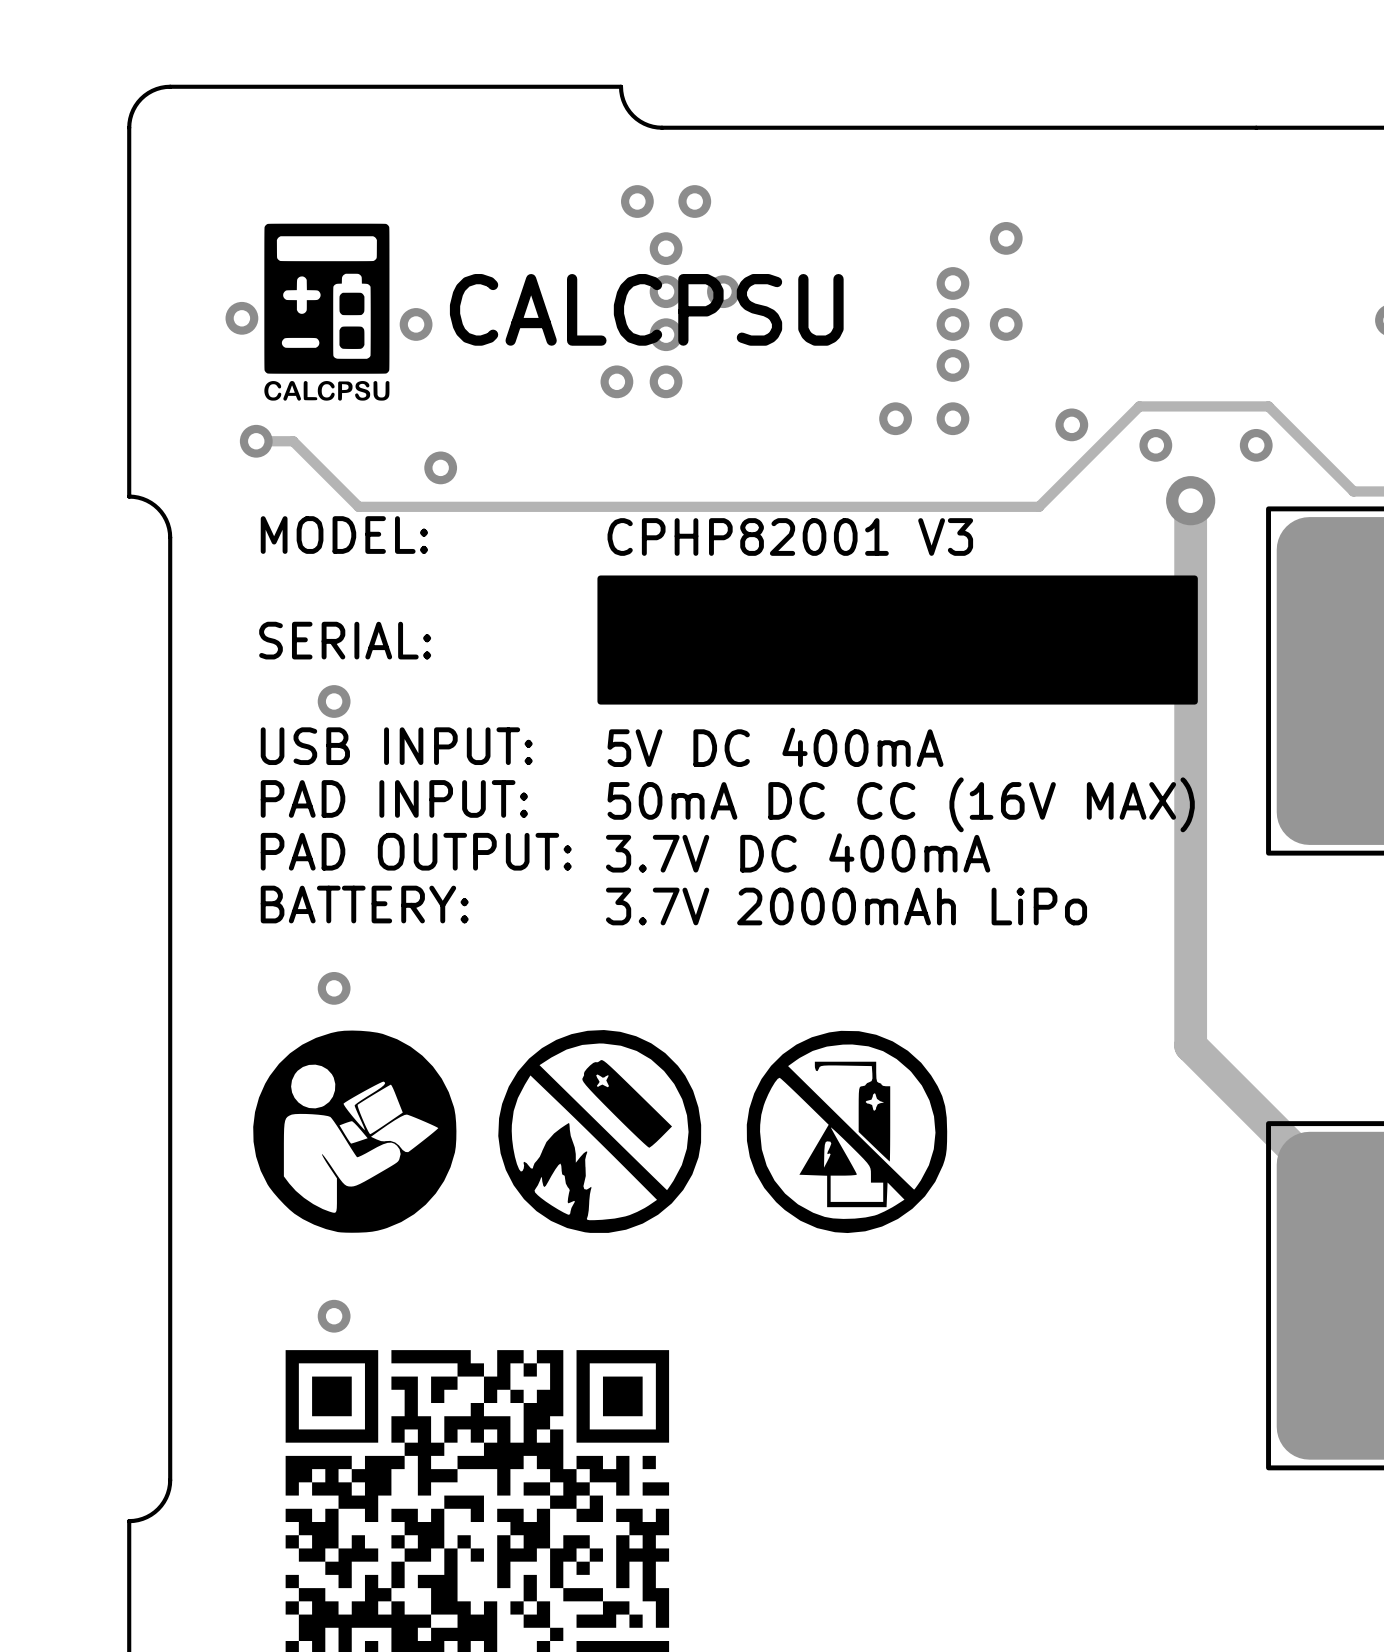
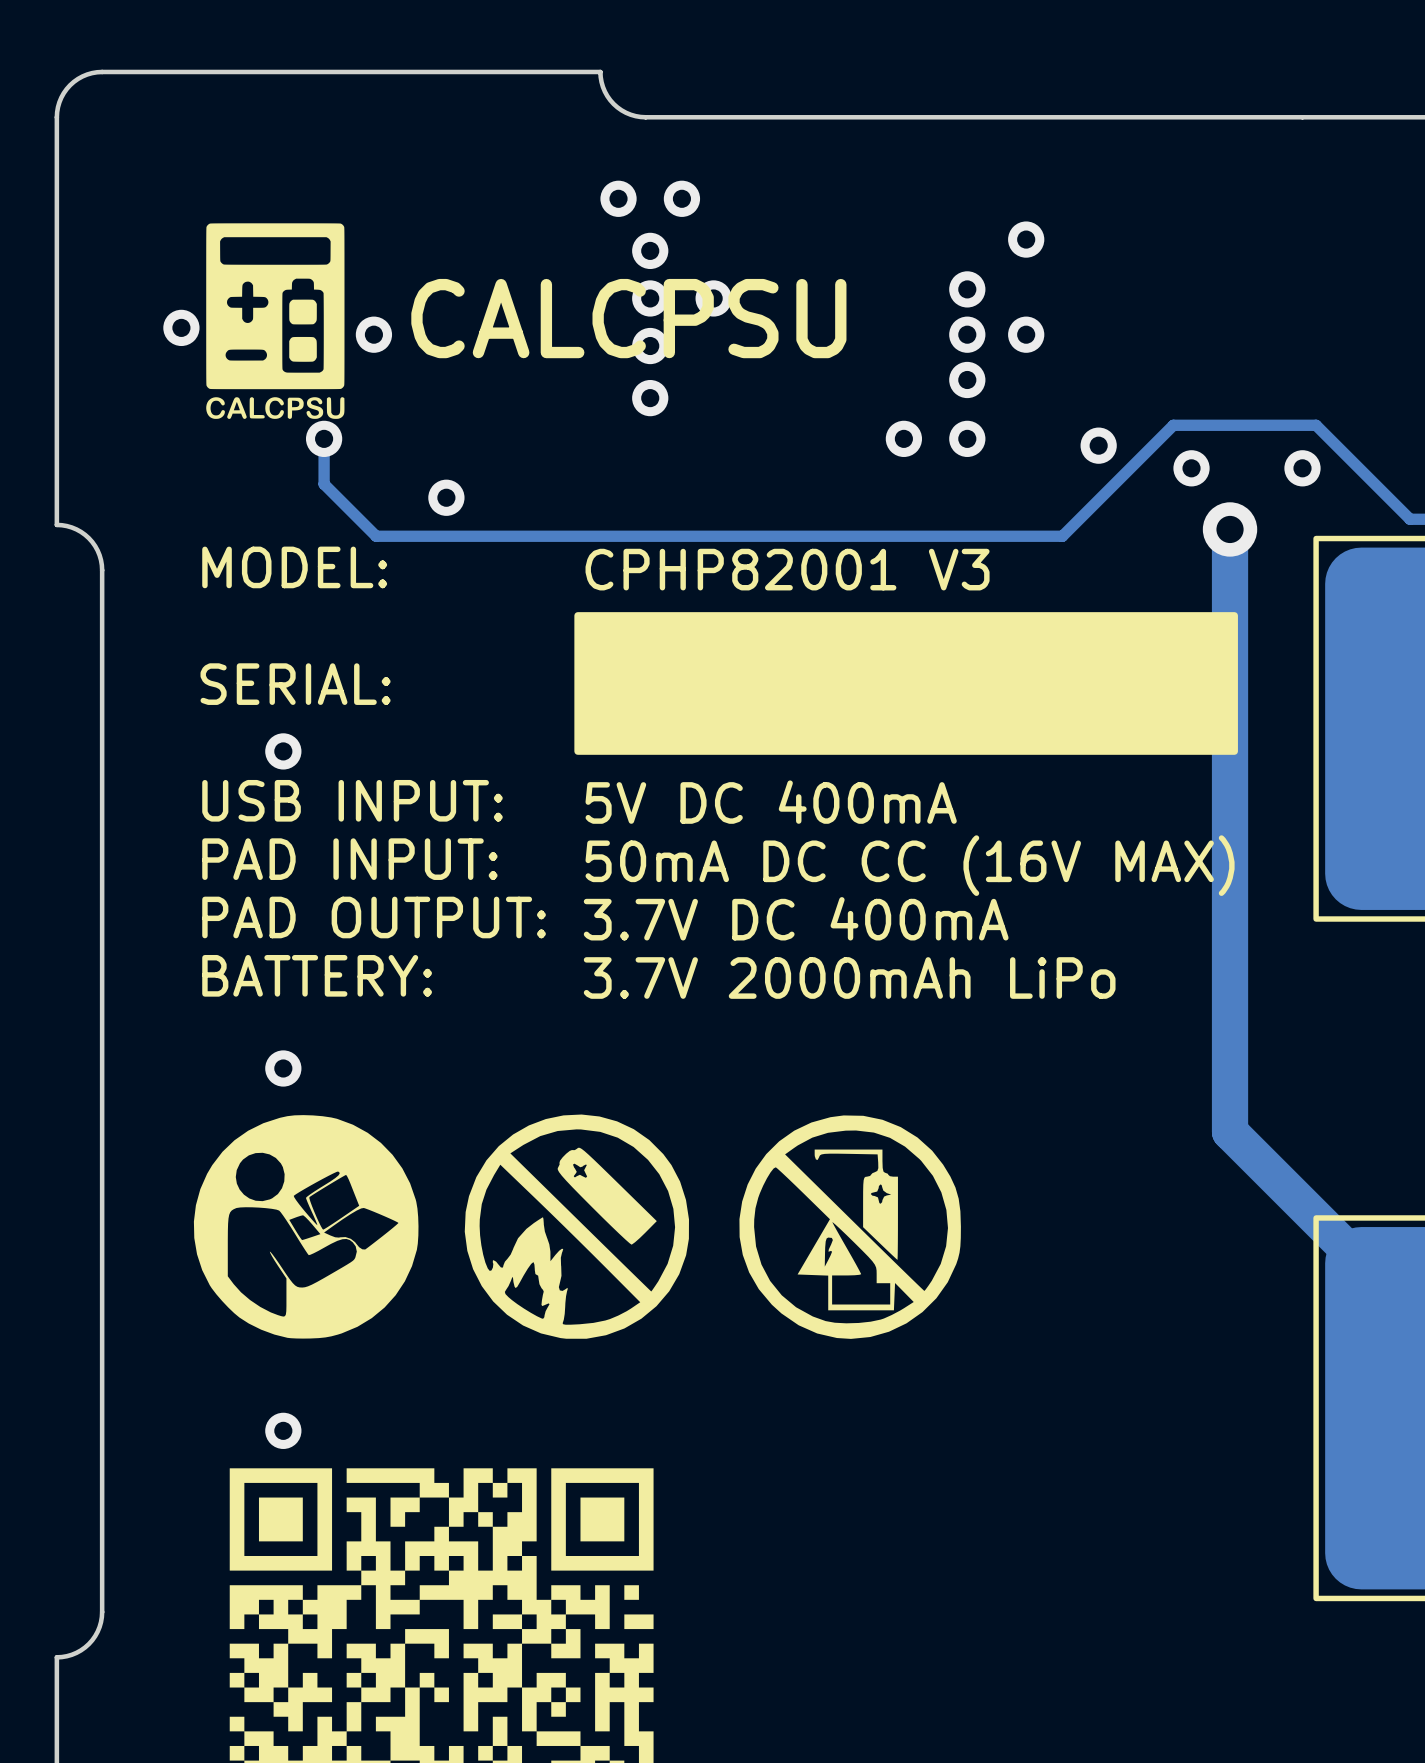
via: (616, 381) -> none
via: none -> (324, 438)
track: (256, 441) (293, 441) (358, 506) (418, 506) -> (324, 438) (324, 484) (376, 536)
via: (256, 441) -> none
via position: (440, 467) -> (446, 497)

